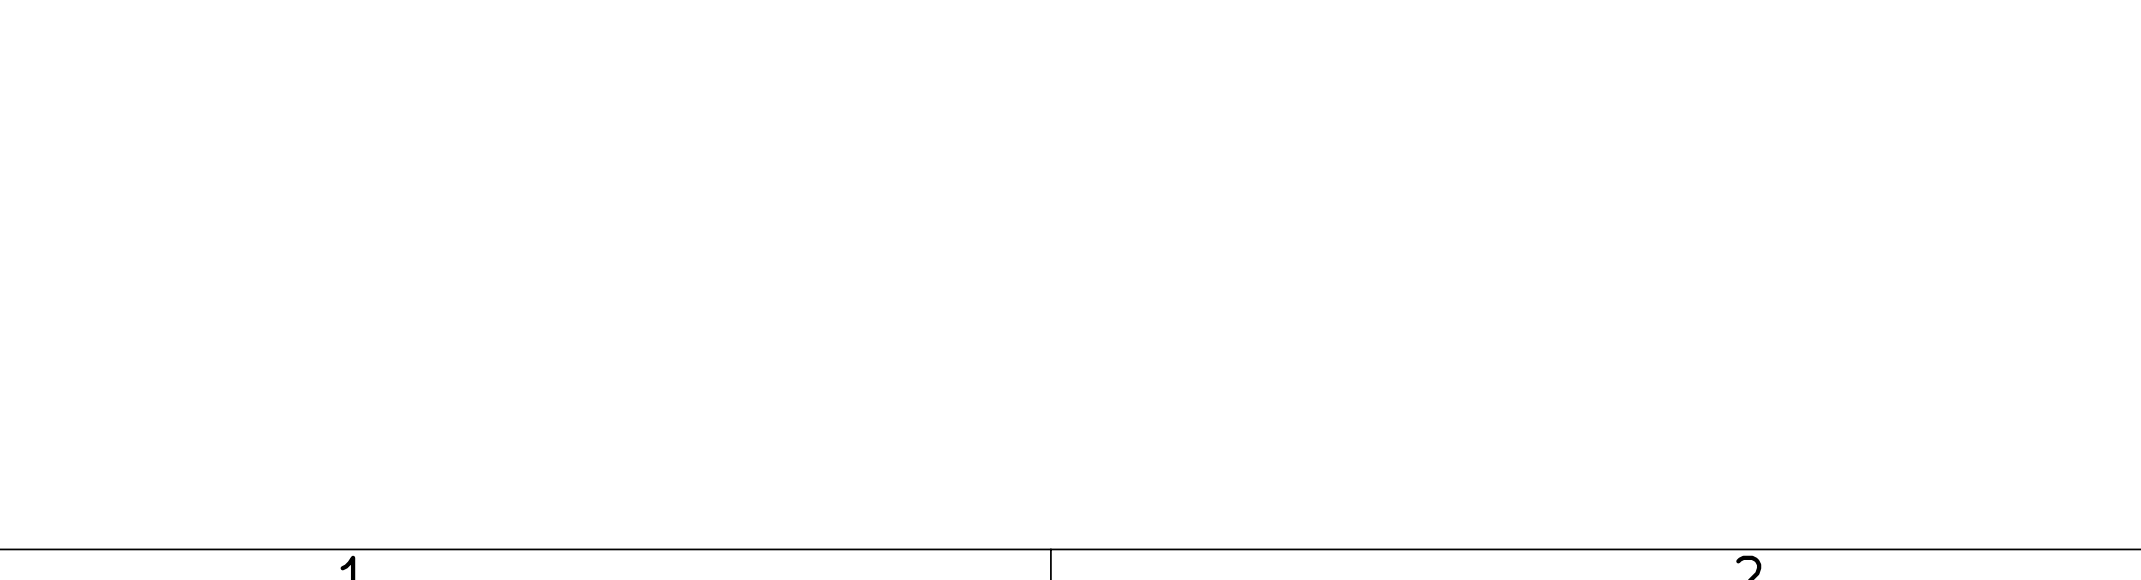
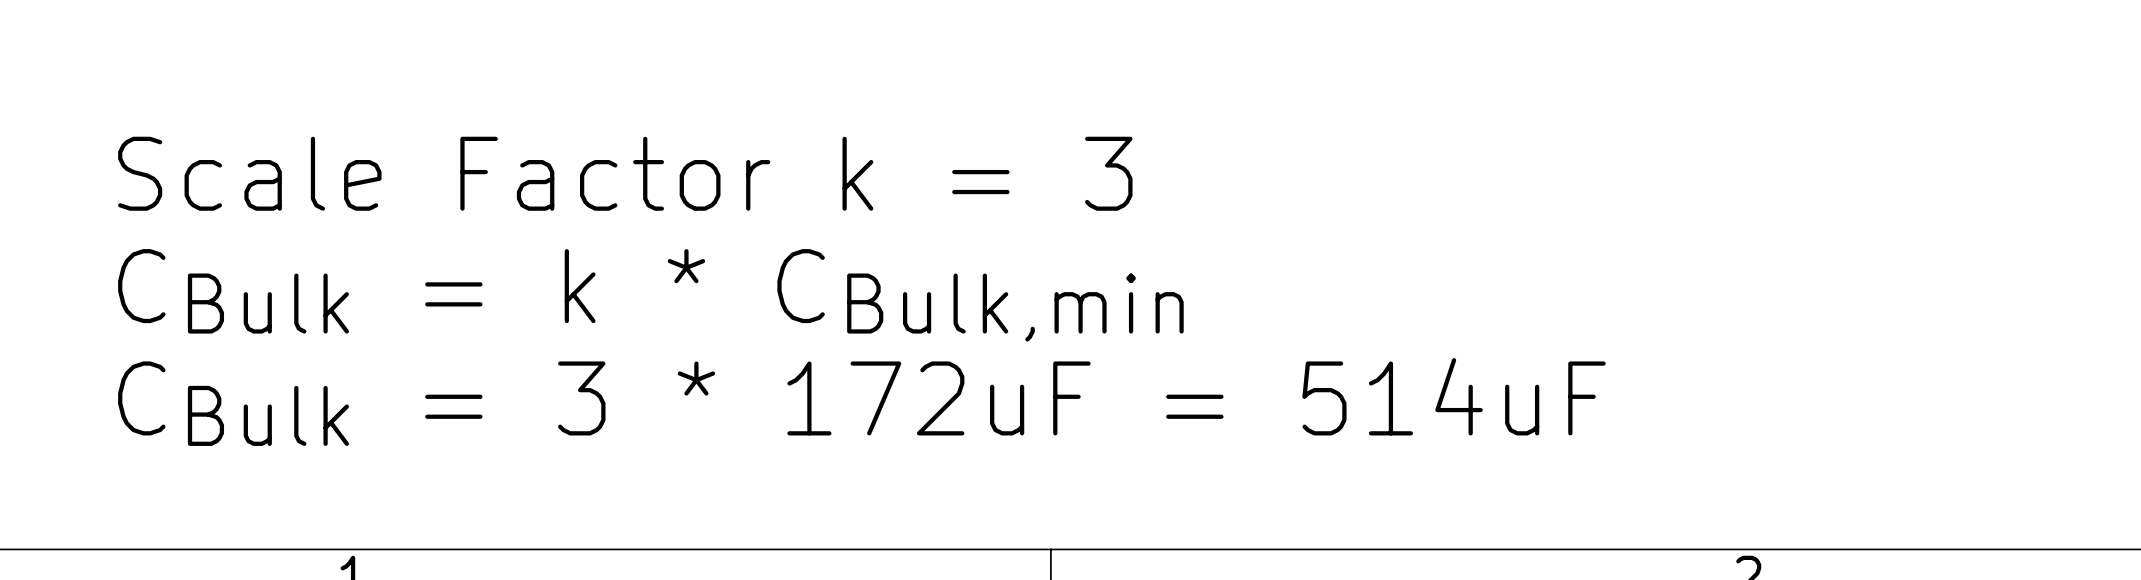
text: none -> Scale Factor k = 3 (625, 173)
text: none -> CBulk = k * CBulk,min (650, 295)
text: none -> CBulk = 3 * 172uF = 514uF (861, 402)

